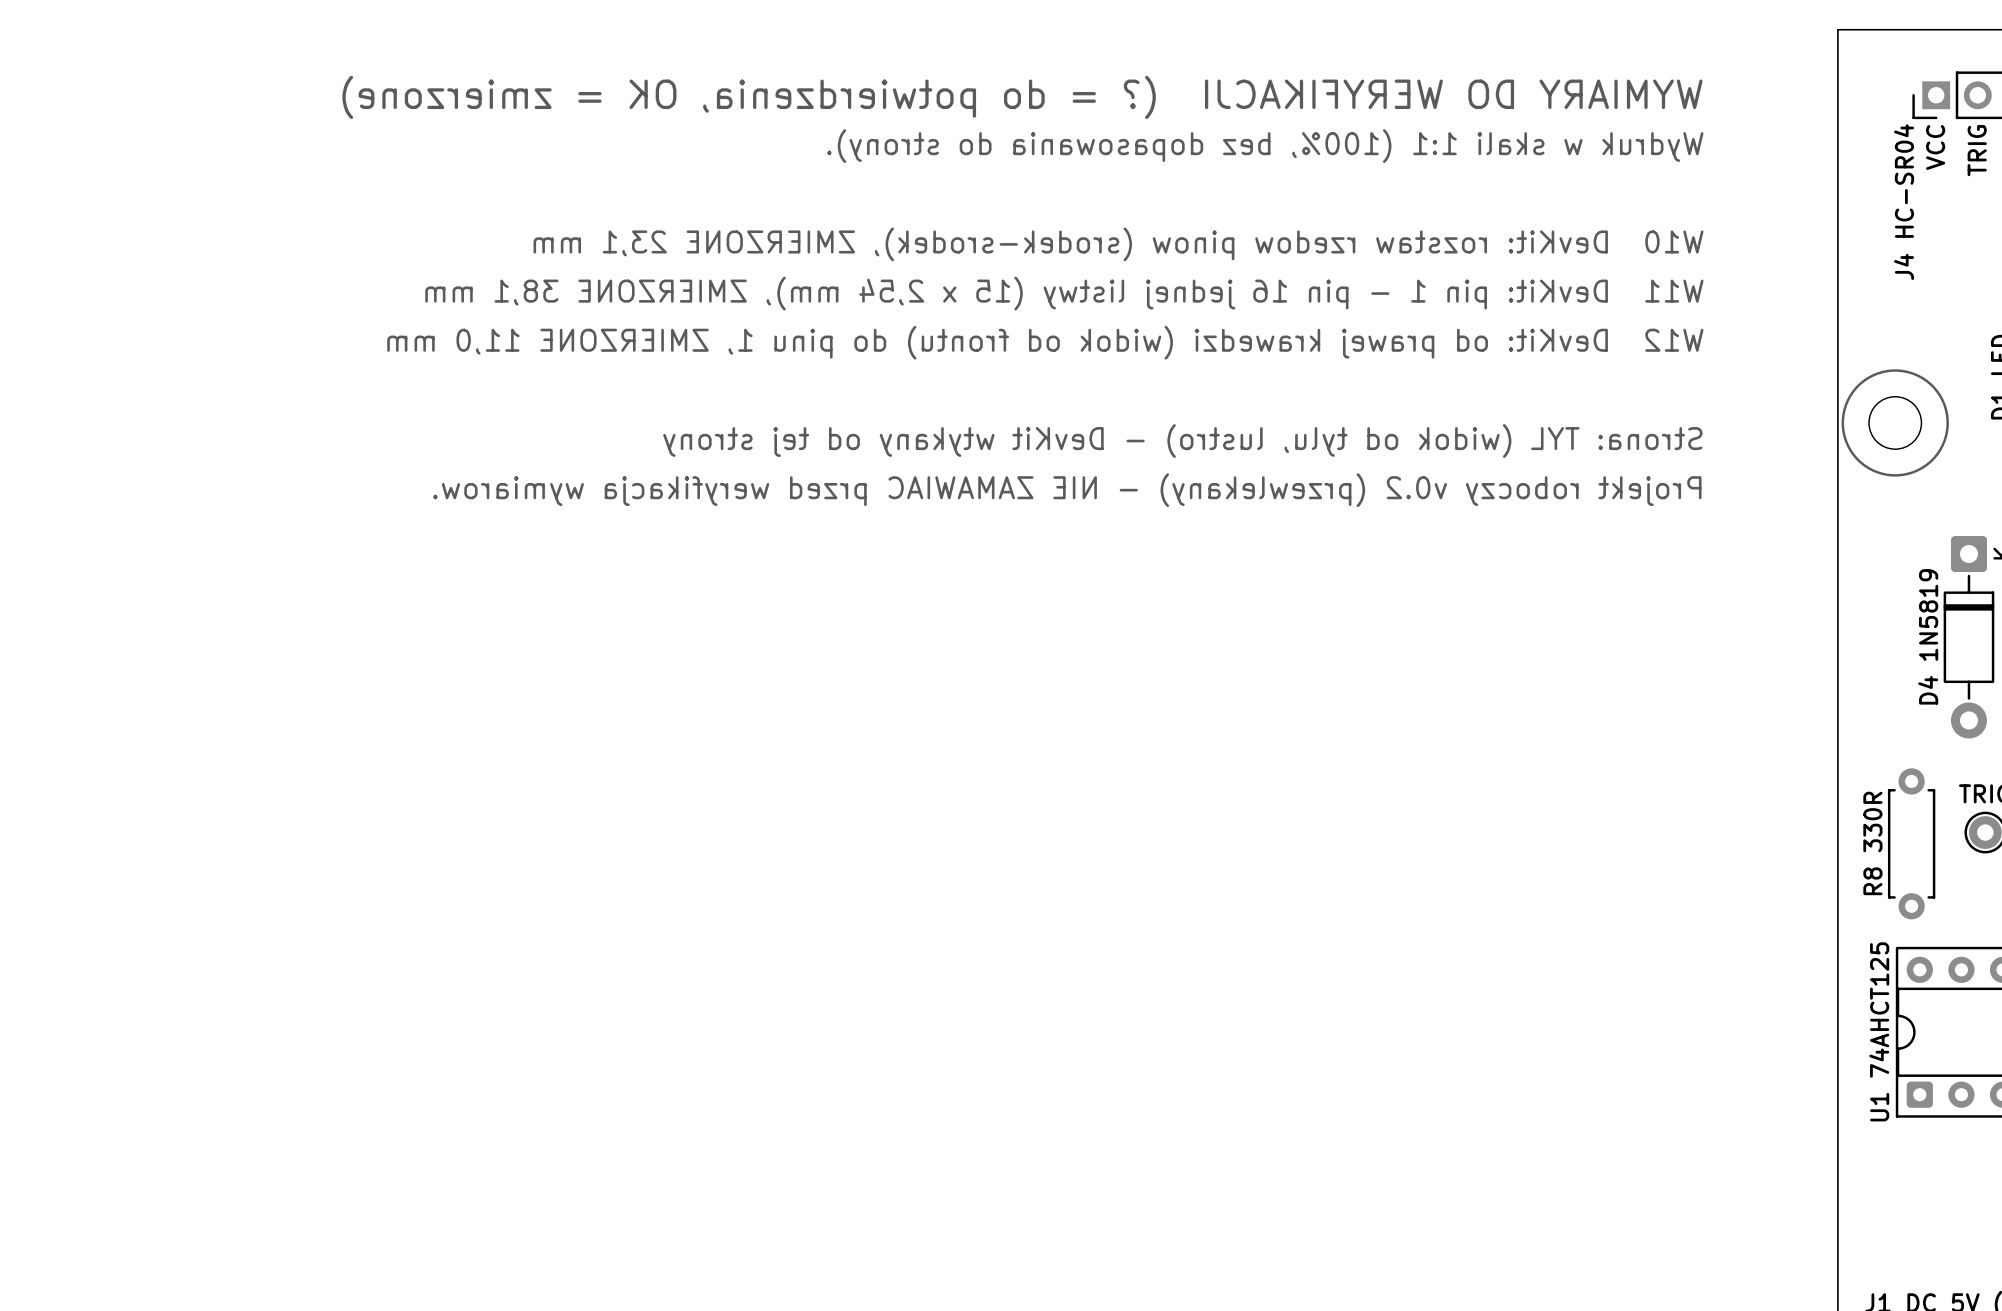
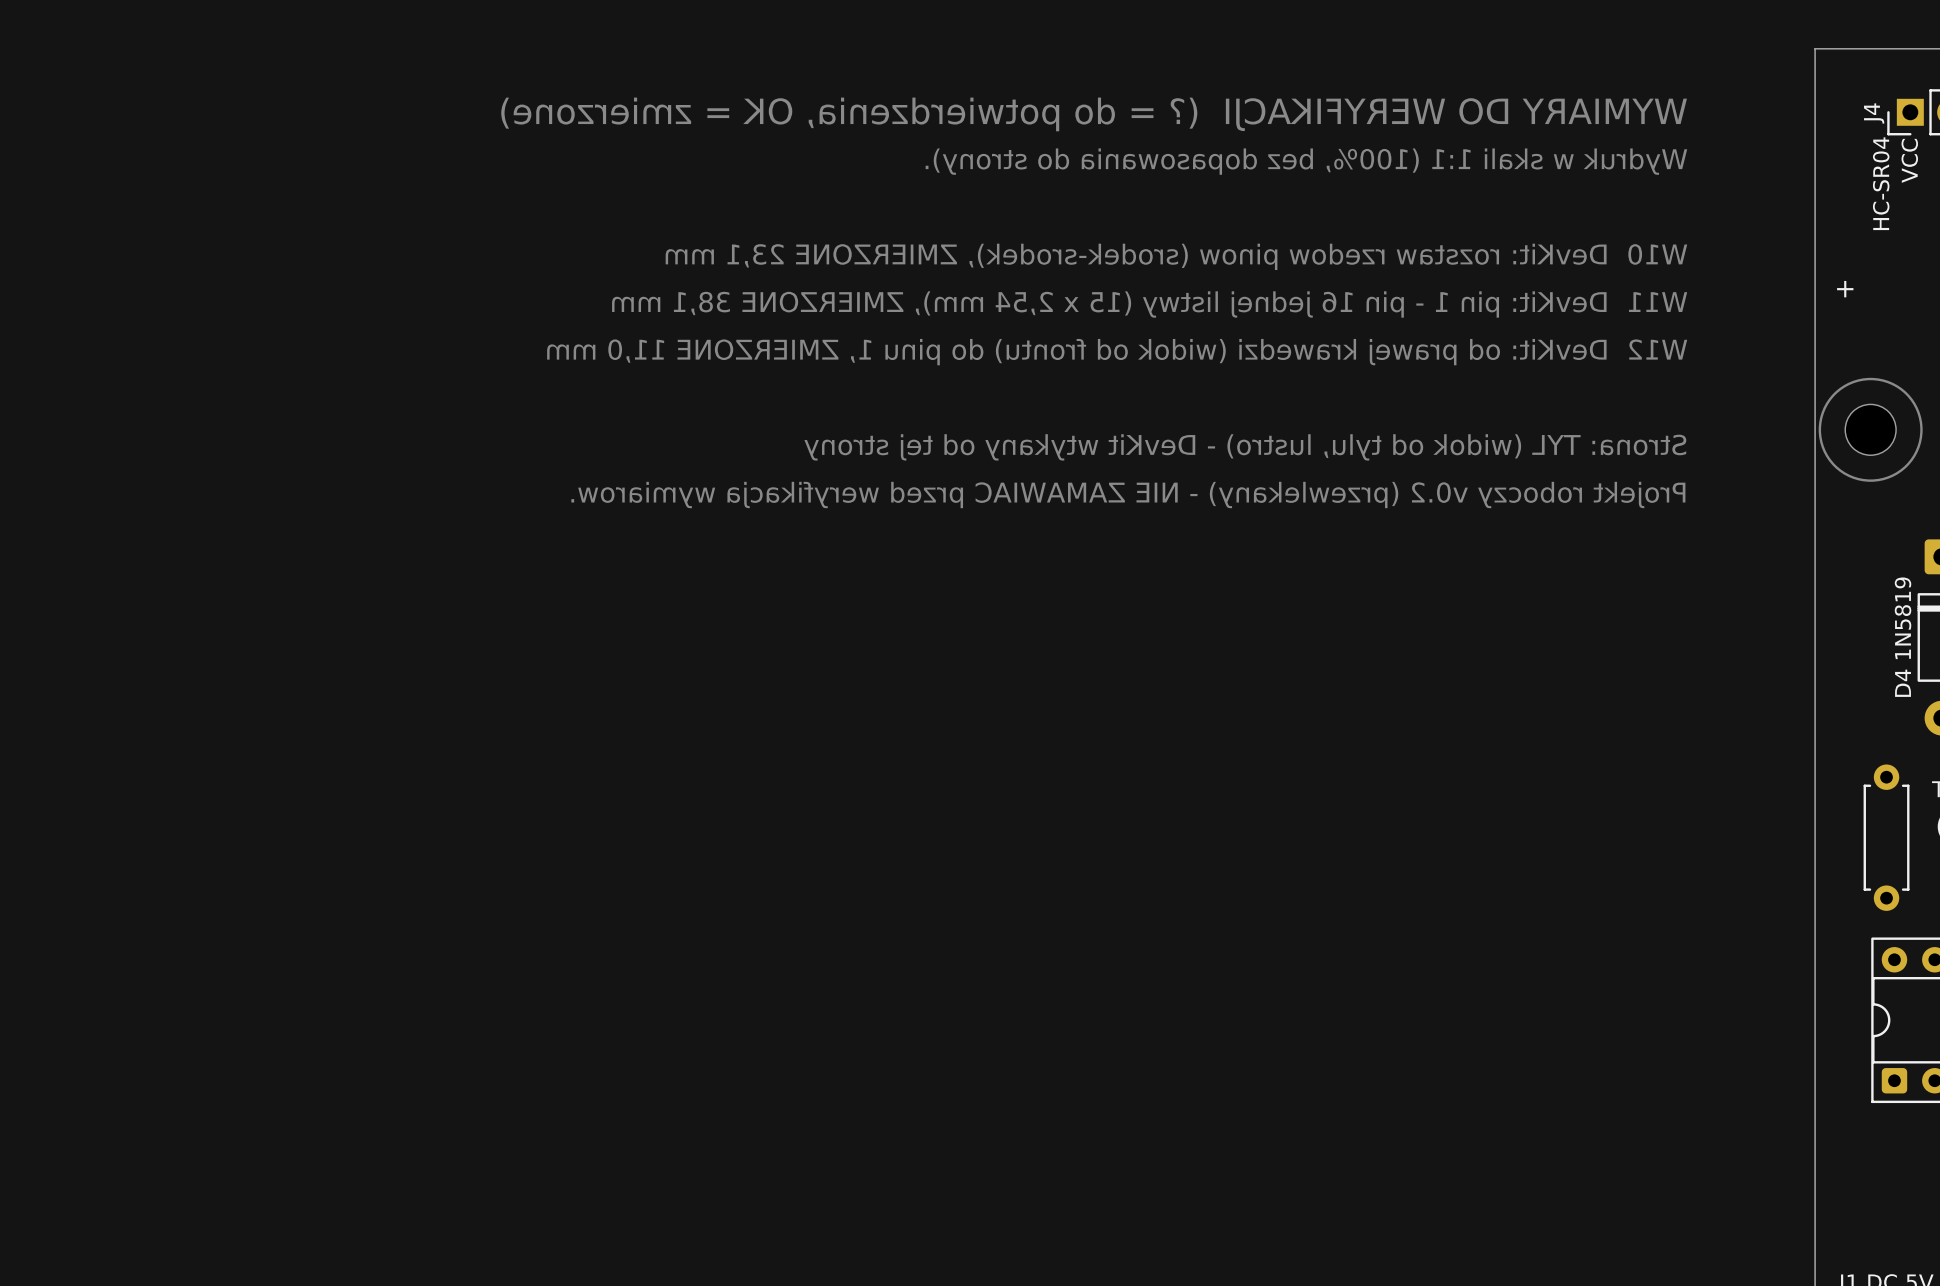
J4 name: none -> J4 (1874, 113)
text: J4 HC-SR04 (1904, 202) -> HC-SR04 (1881, 183)
text: none -> + (1845, 289)
text: R8 330R (1872, 843) -> none
text: U1 74AHCT125 (1879, 1031) -> none

